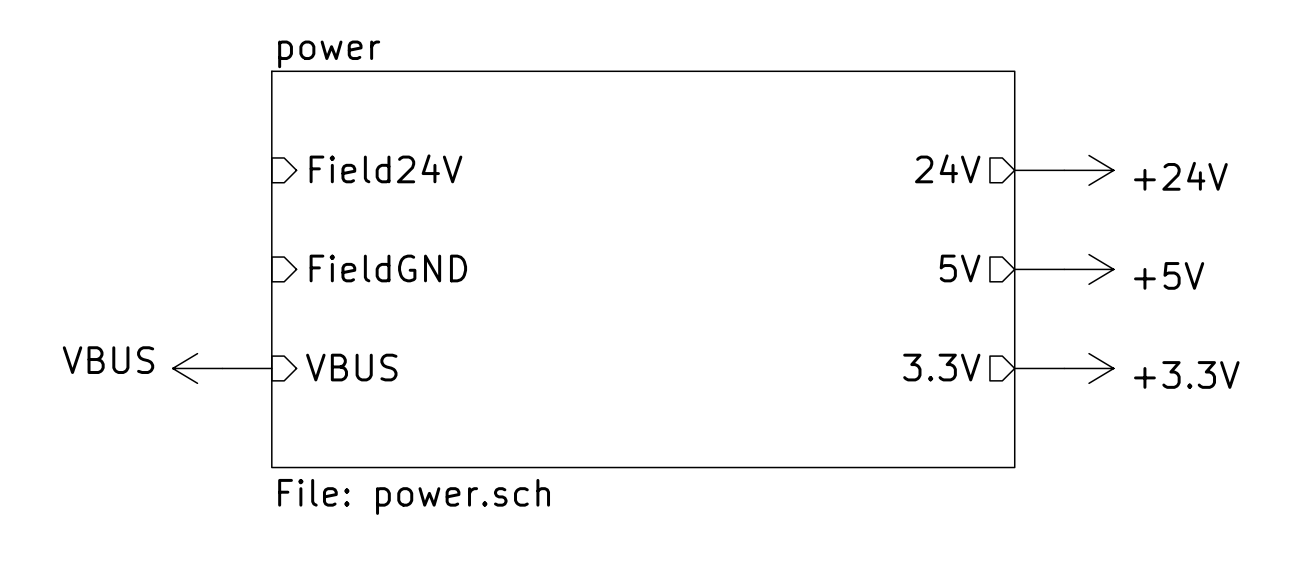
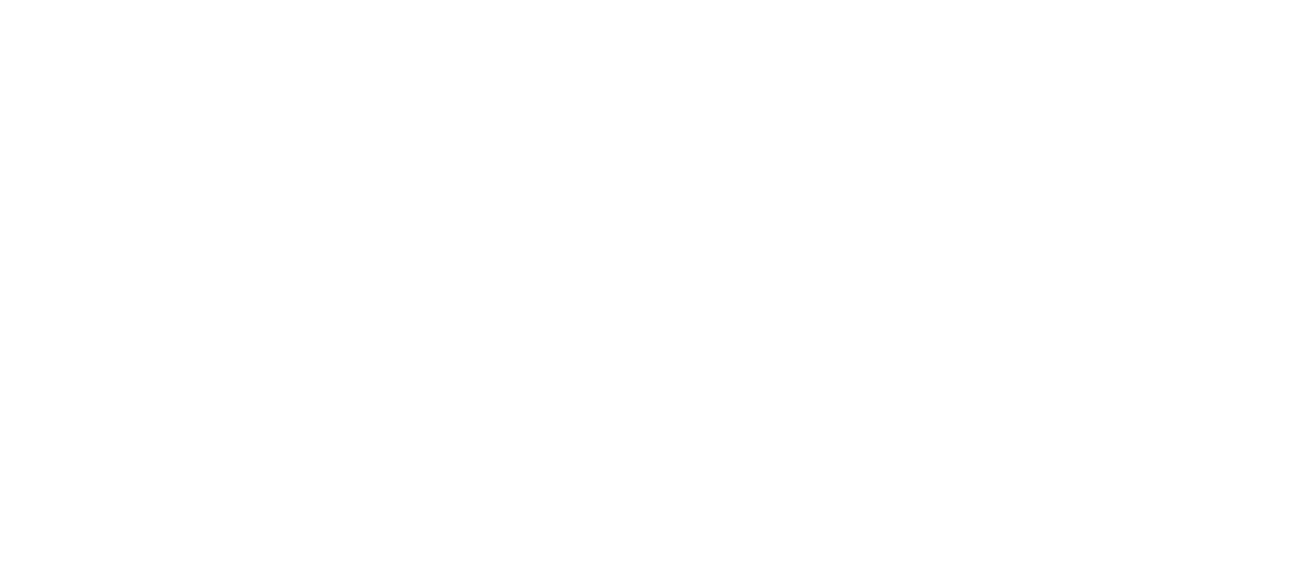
sheet pin: Field24V (385, 168) -> none
sheet pin: 24V (947, 168) -> none
wire: (1014, 170) (1064, 170) -> none
power symbol: +24V (1089, 170) -> none
sheet pin: FieldGND (388, 268) -> none
sheet pin: 5V (960, 268) -> none
sheet power: File: power.sch (643, 269) -> none
wire: (1014, 269) (1064, 269) -> none
power symbol: +5V (1089, 269) -> none
sheet pin: VBUS (351, 367) -> none
sheet pin: 3.3V (941, 367) -> none
power symbol: VBUS (197, 368) -> none
wire: (222, 368) (271, 368) -> none
wire: (1014, 368) (1064, 368) -> none
power symbol: +3.3V (1089, 368) -> none

